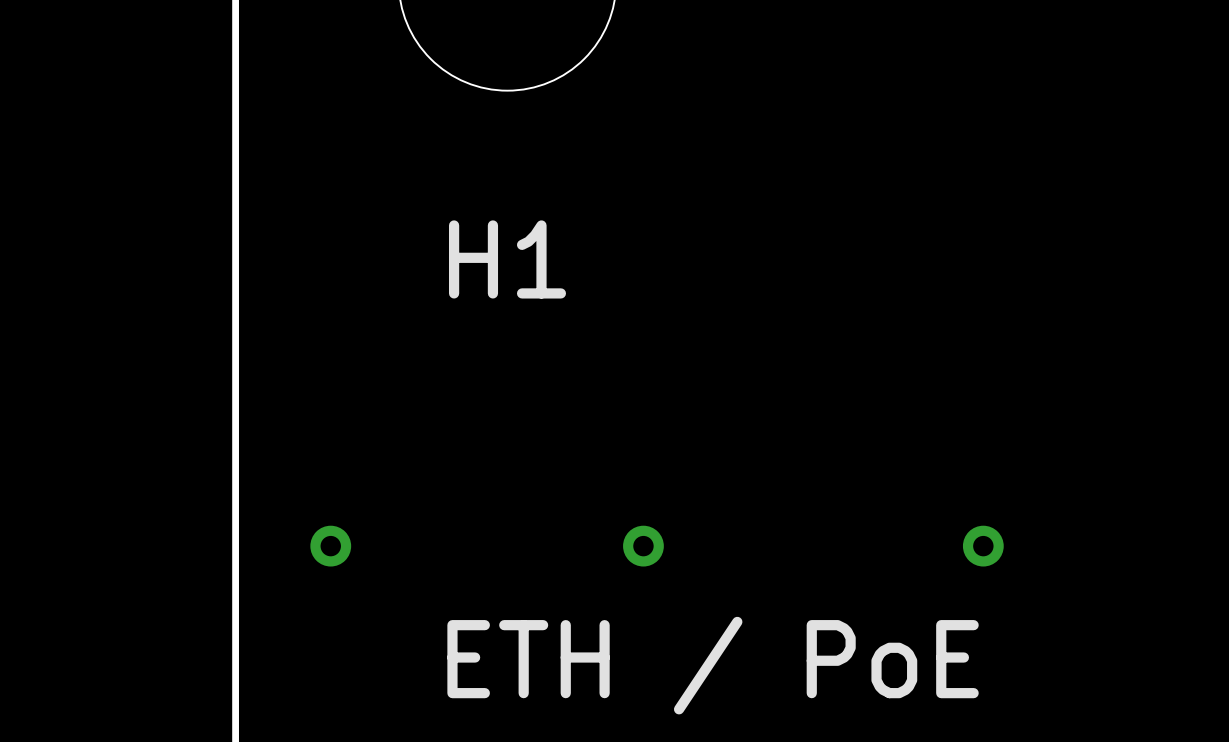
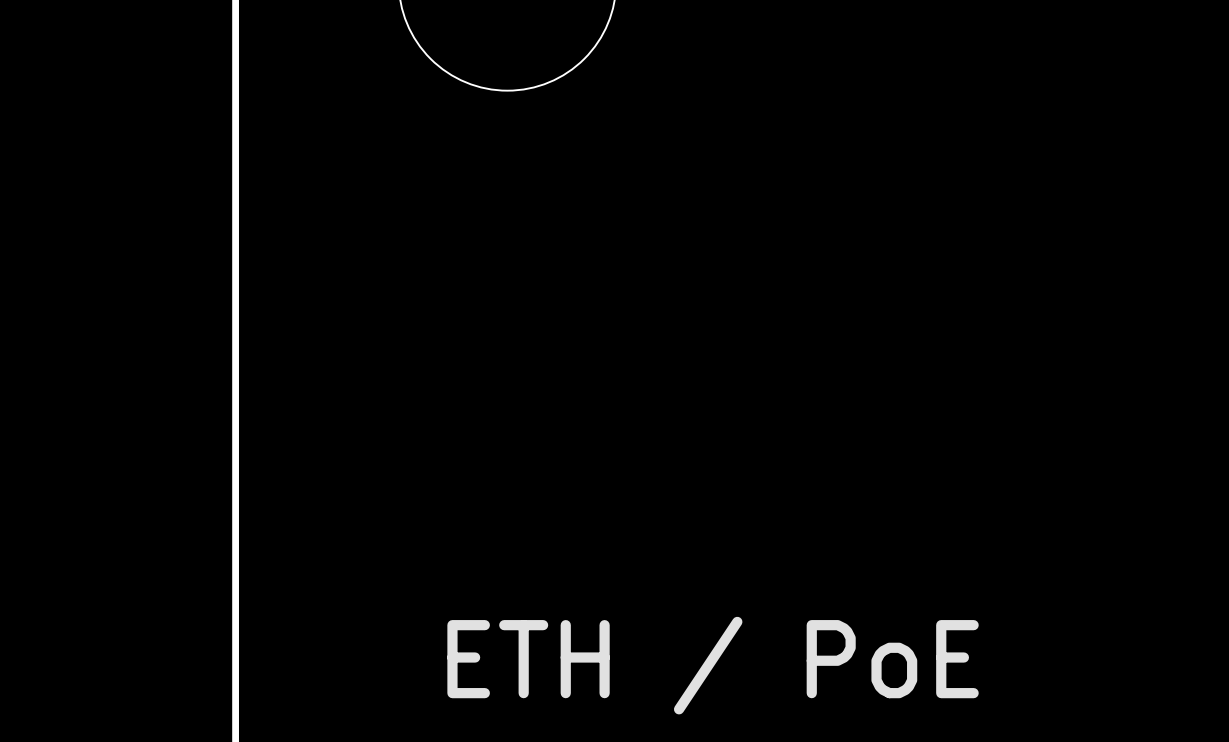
H1 name: H1 (507, 259) -> none
via: (330, 546) -> none
via: (643, 546) -> none
via: (983, 546) -> none

